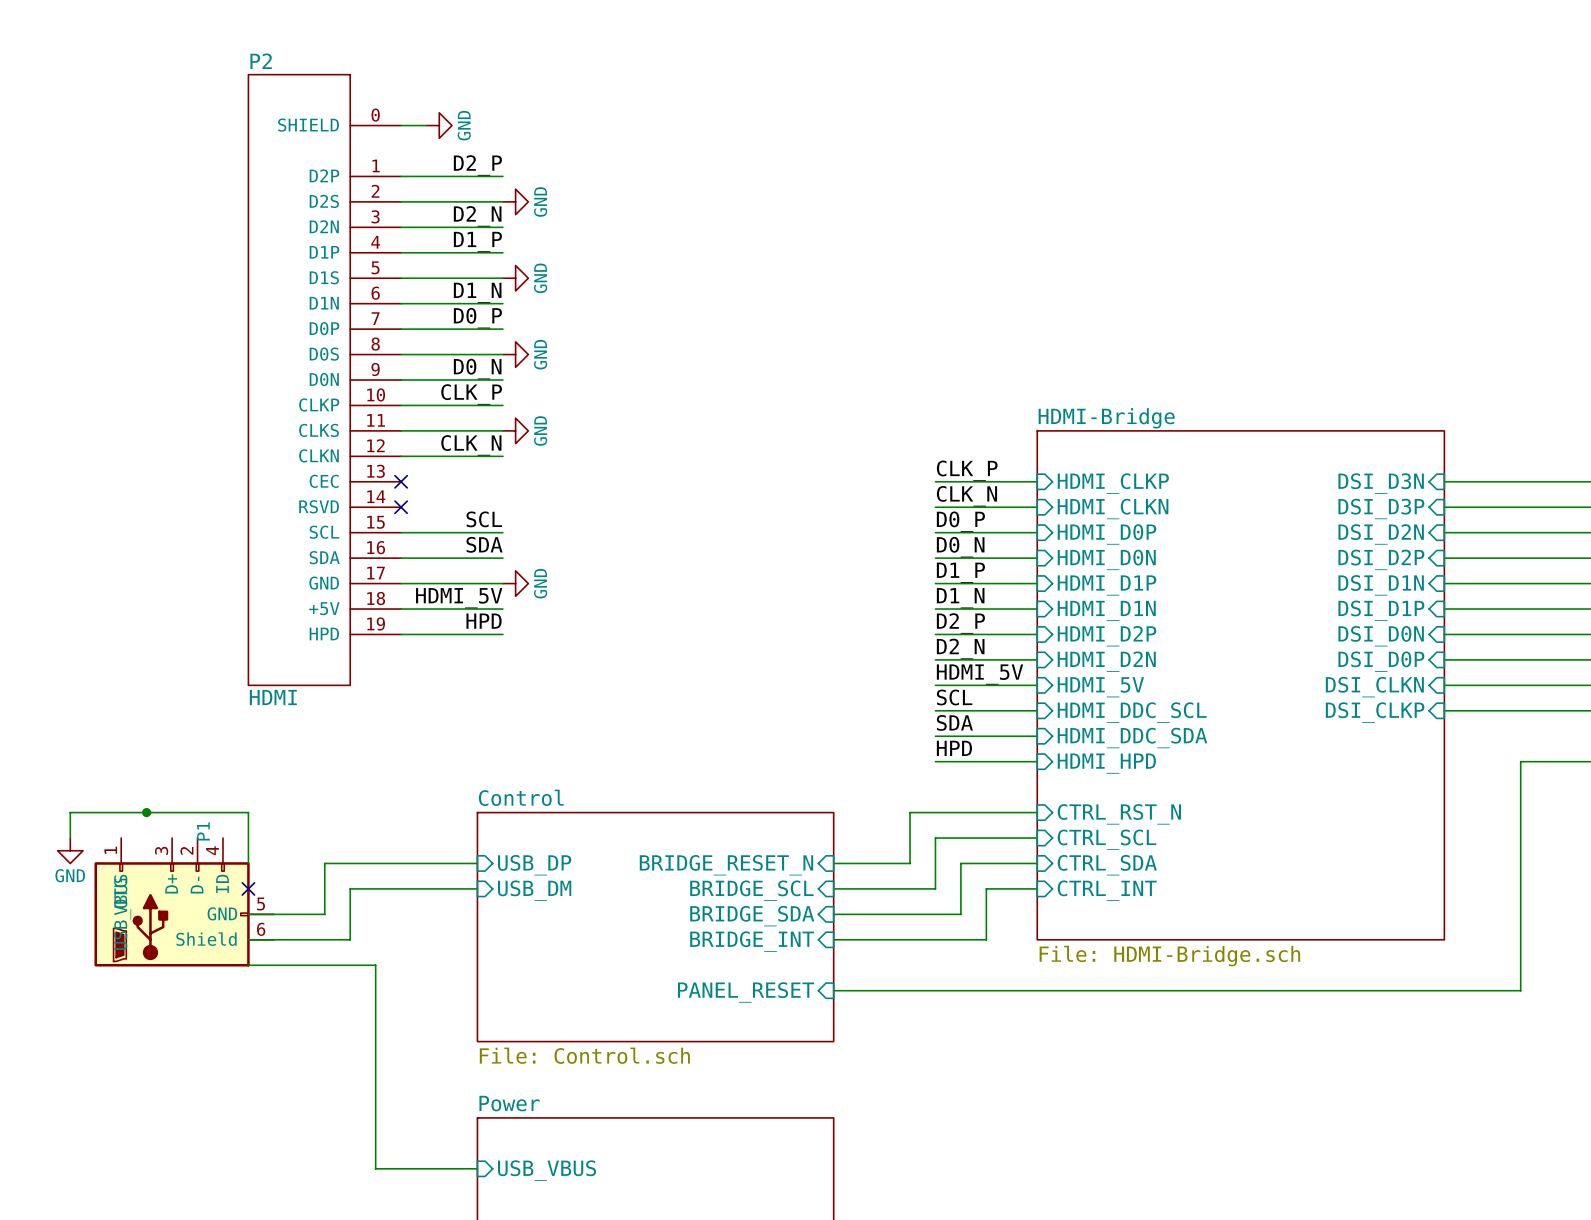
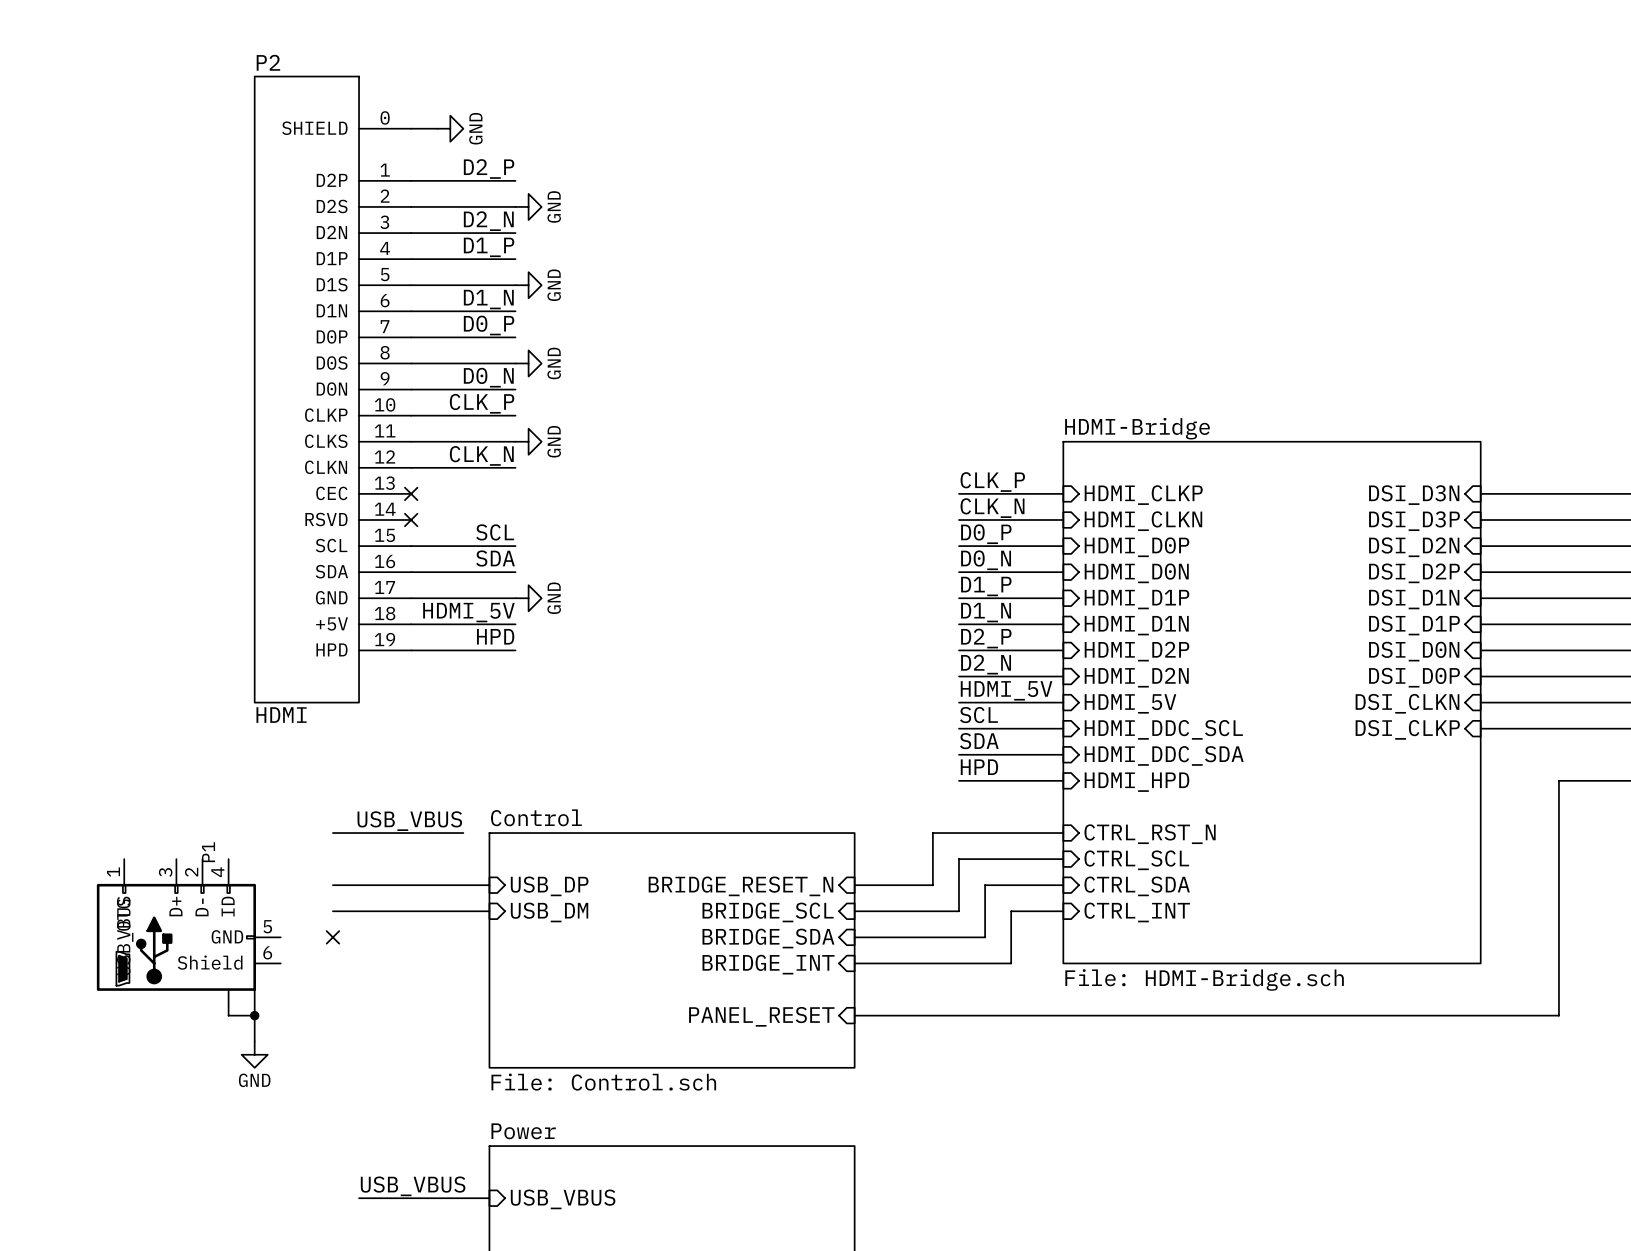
label: none -> USB_VBUS (409, 821)
junction: (146, 812) -> none
wire: none -> (332, 833) (463, 833)
wire: (70, 838) (70, 812) (248, 812) (248, 863) -> none
power symbol: GND (70, 850) -> none
wire: (324, 863) (324, 914) (248, 914) -> none
no-connect mark: (248, 888) -> none
wire: (350, 888) (350, 939) (248, 939) -> (359, 911) (332, 911)
no-connect mark: none -> (332, 937)
wire: none -> (228, 989) (228, 1015) (254, 1015)
wire: (248, 965) (375, 965) (375, 1168) -> (254, 989) (254, 1041)
junction: none -> (254, 1015)
power symbol: none -> GND (254, 1054)
label: none -> USB_VBUS (413, 1186)
wire: none -> (359, 1198) (385, 1198)

